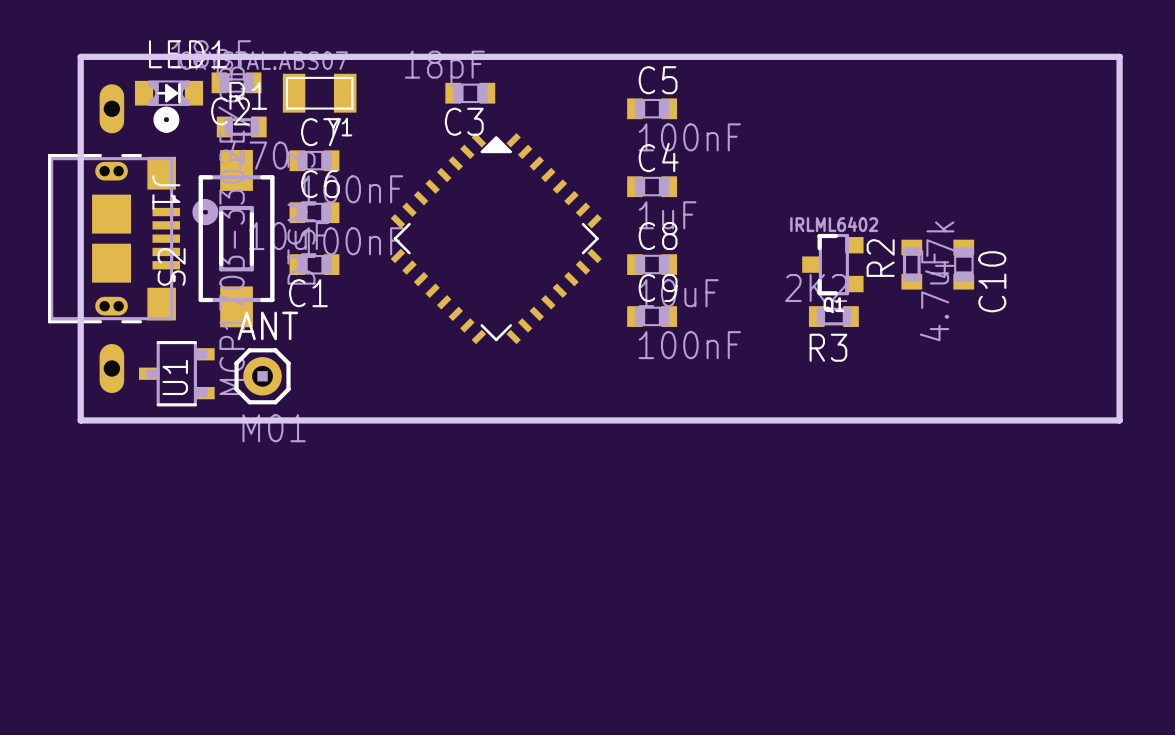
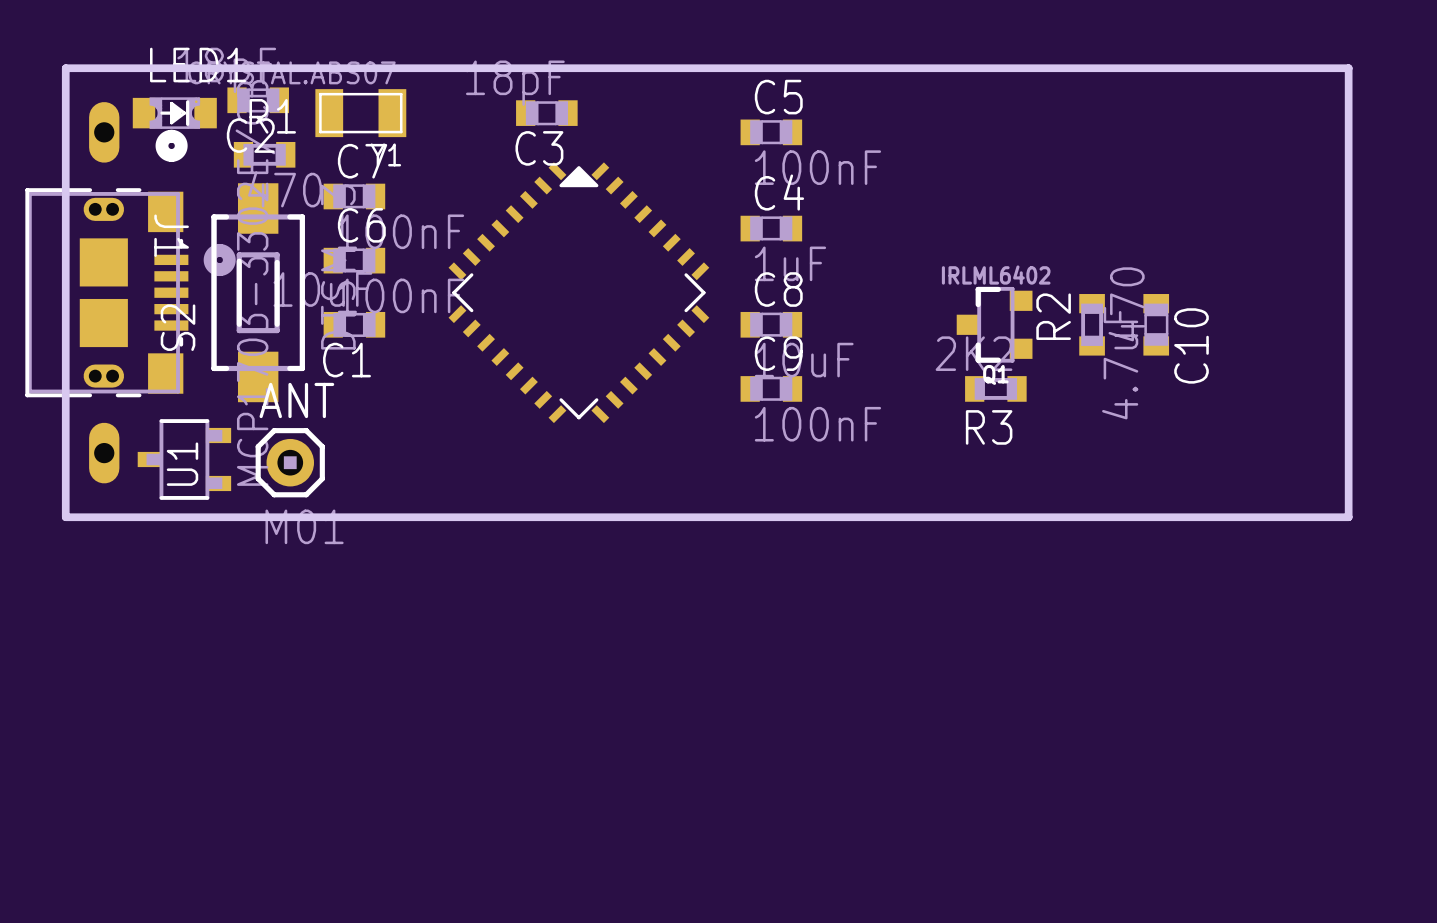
R2 value: 47k (939, 249) -> 470 (1126, 304)

